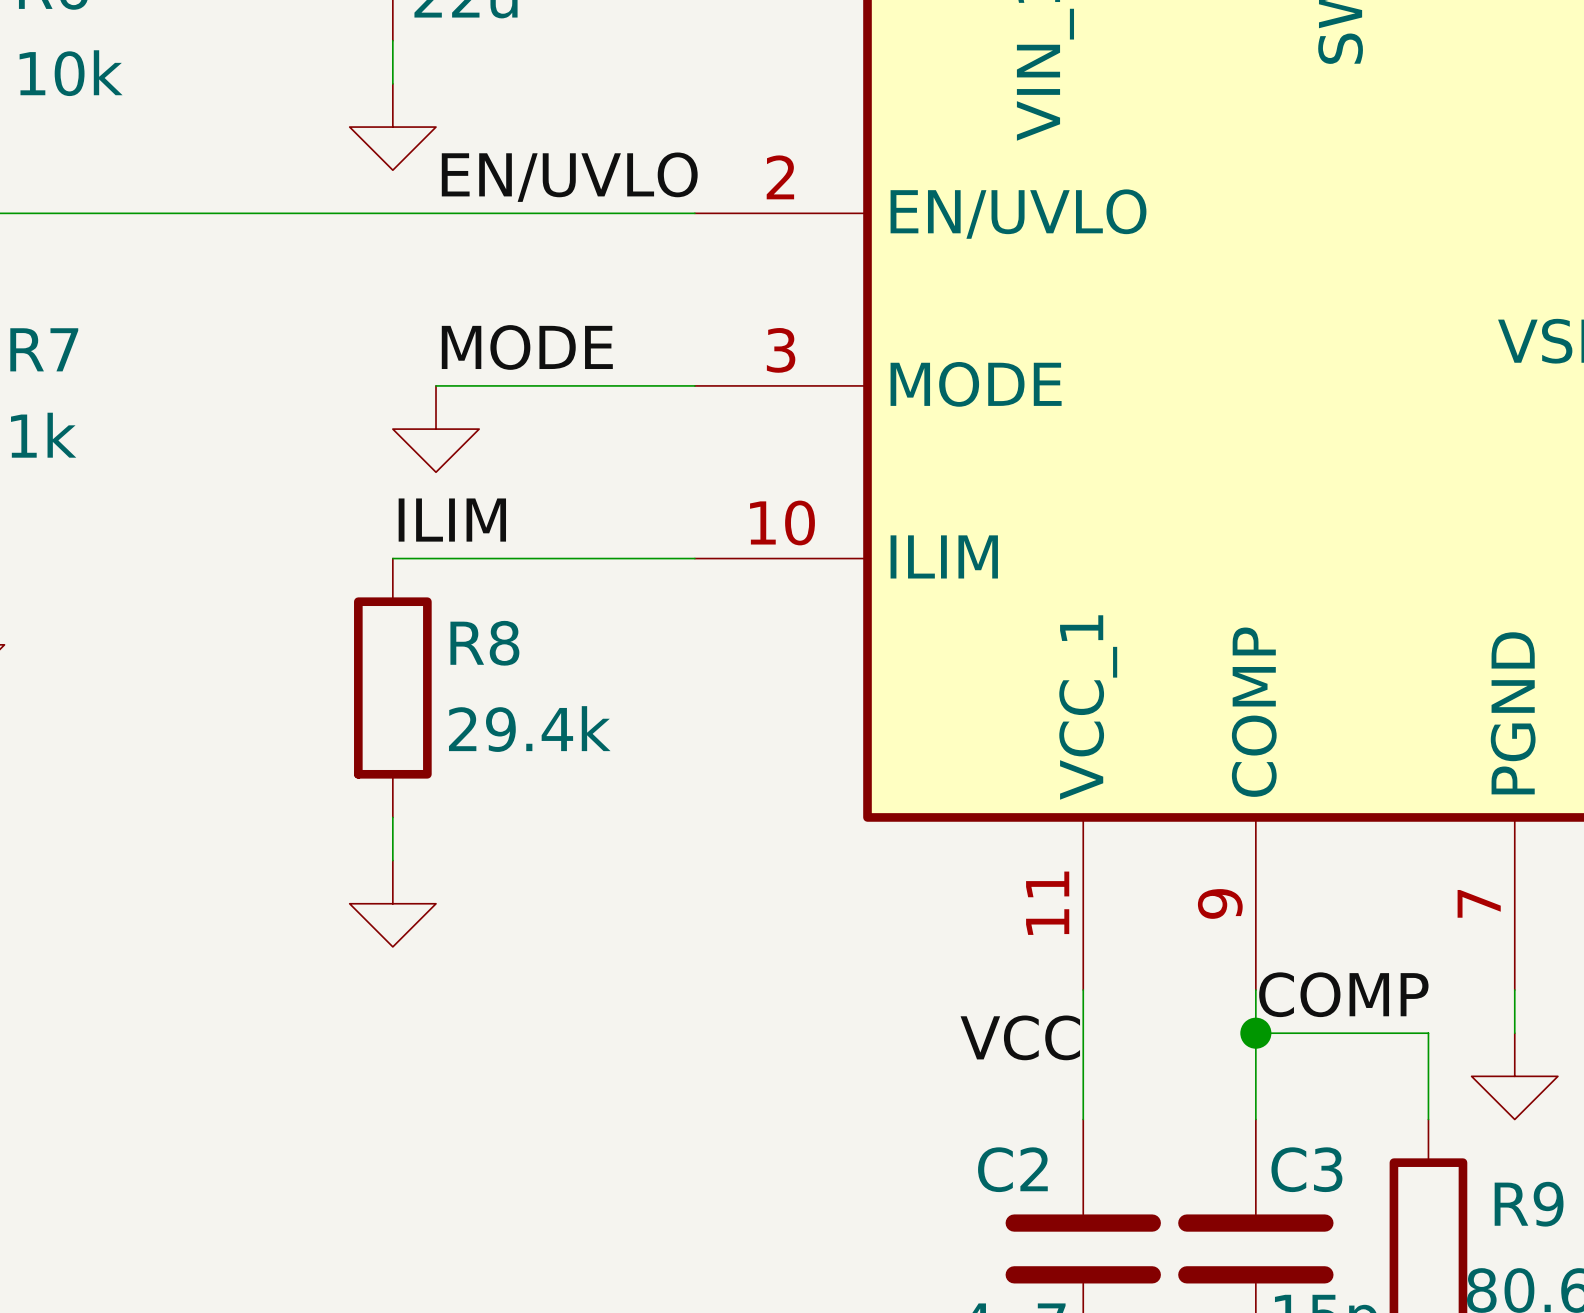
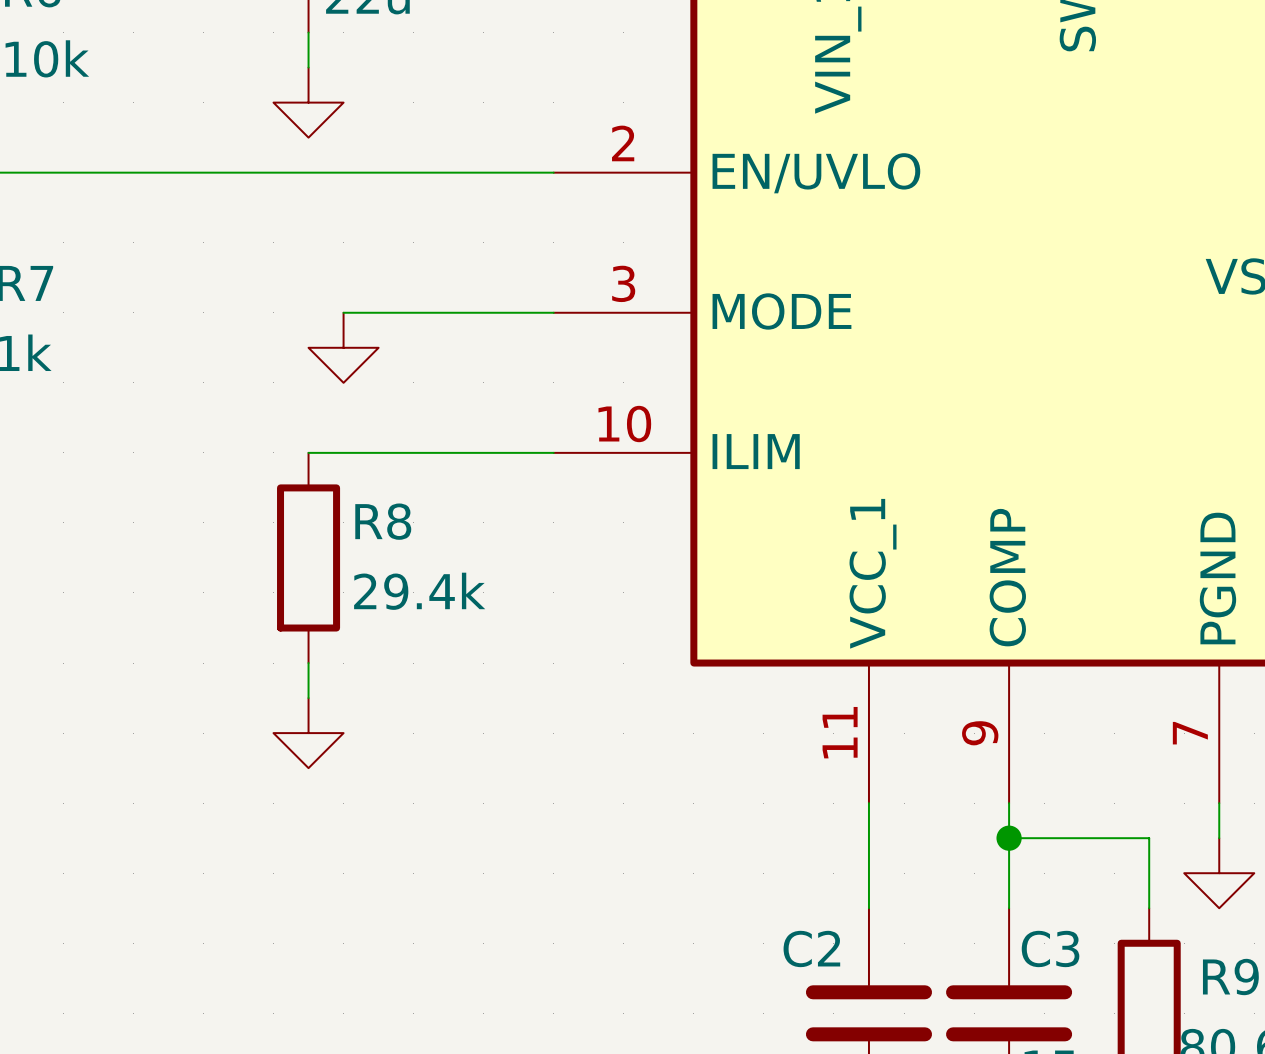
label: EN/UVLO (569, 177) -> none
label: MODE (527, 347) -> none
label: ILIM (452, 520) -> none
label: COMP (1343, 994) -> none
label: VCC (1020, 1037) -> none

